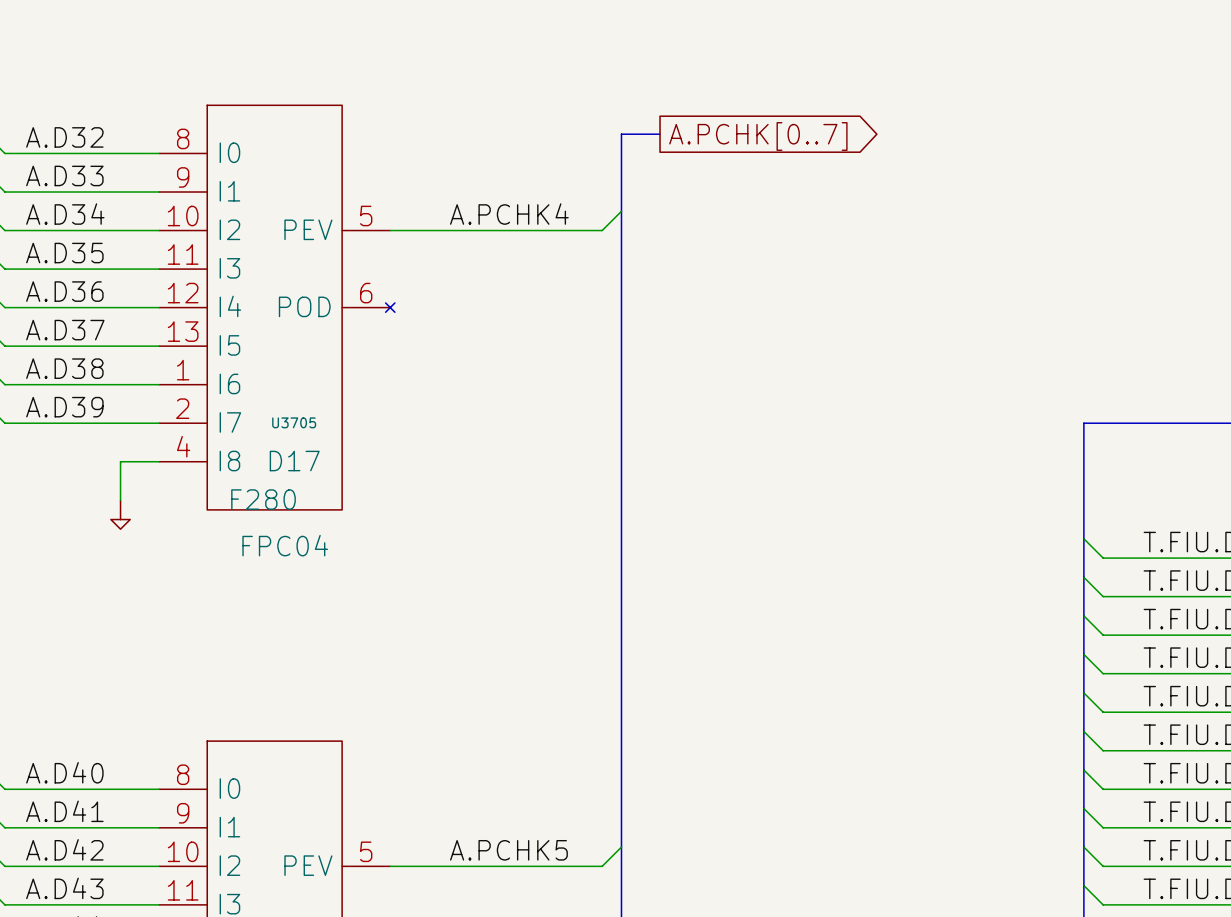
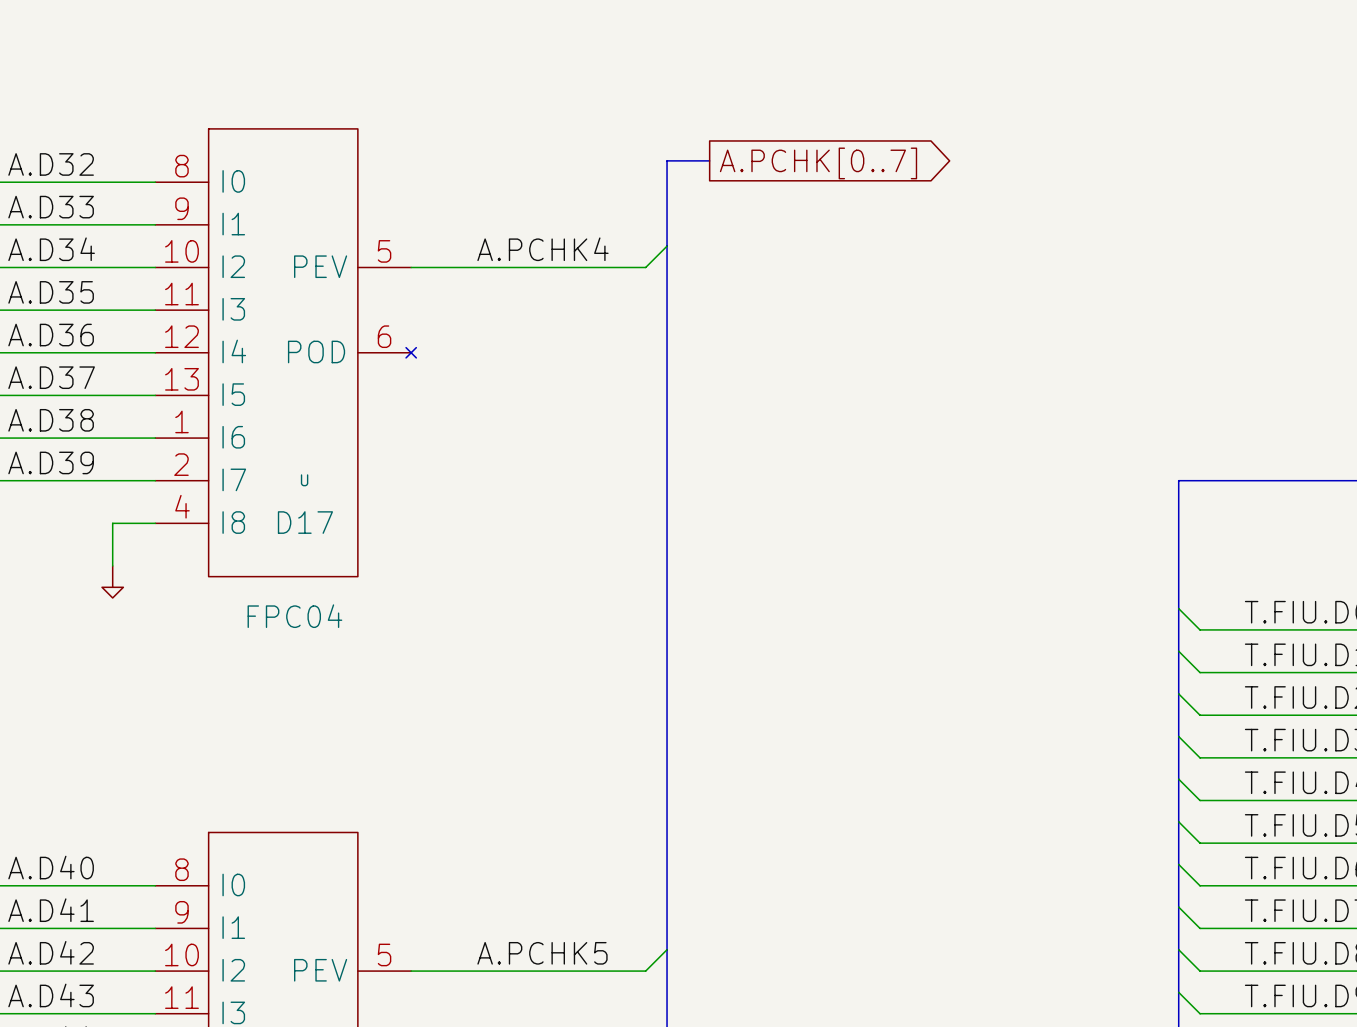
U3705 name: U3705 (294, 422) -> U (304, 480)
U3705 value: F280 (263, 499) -> none

